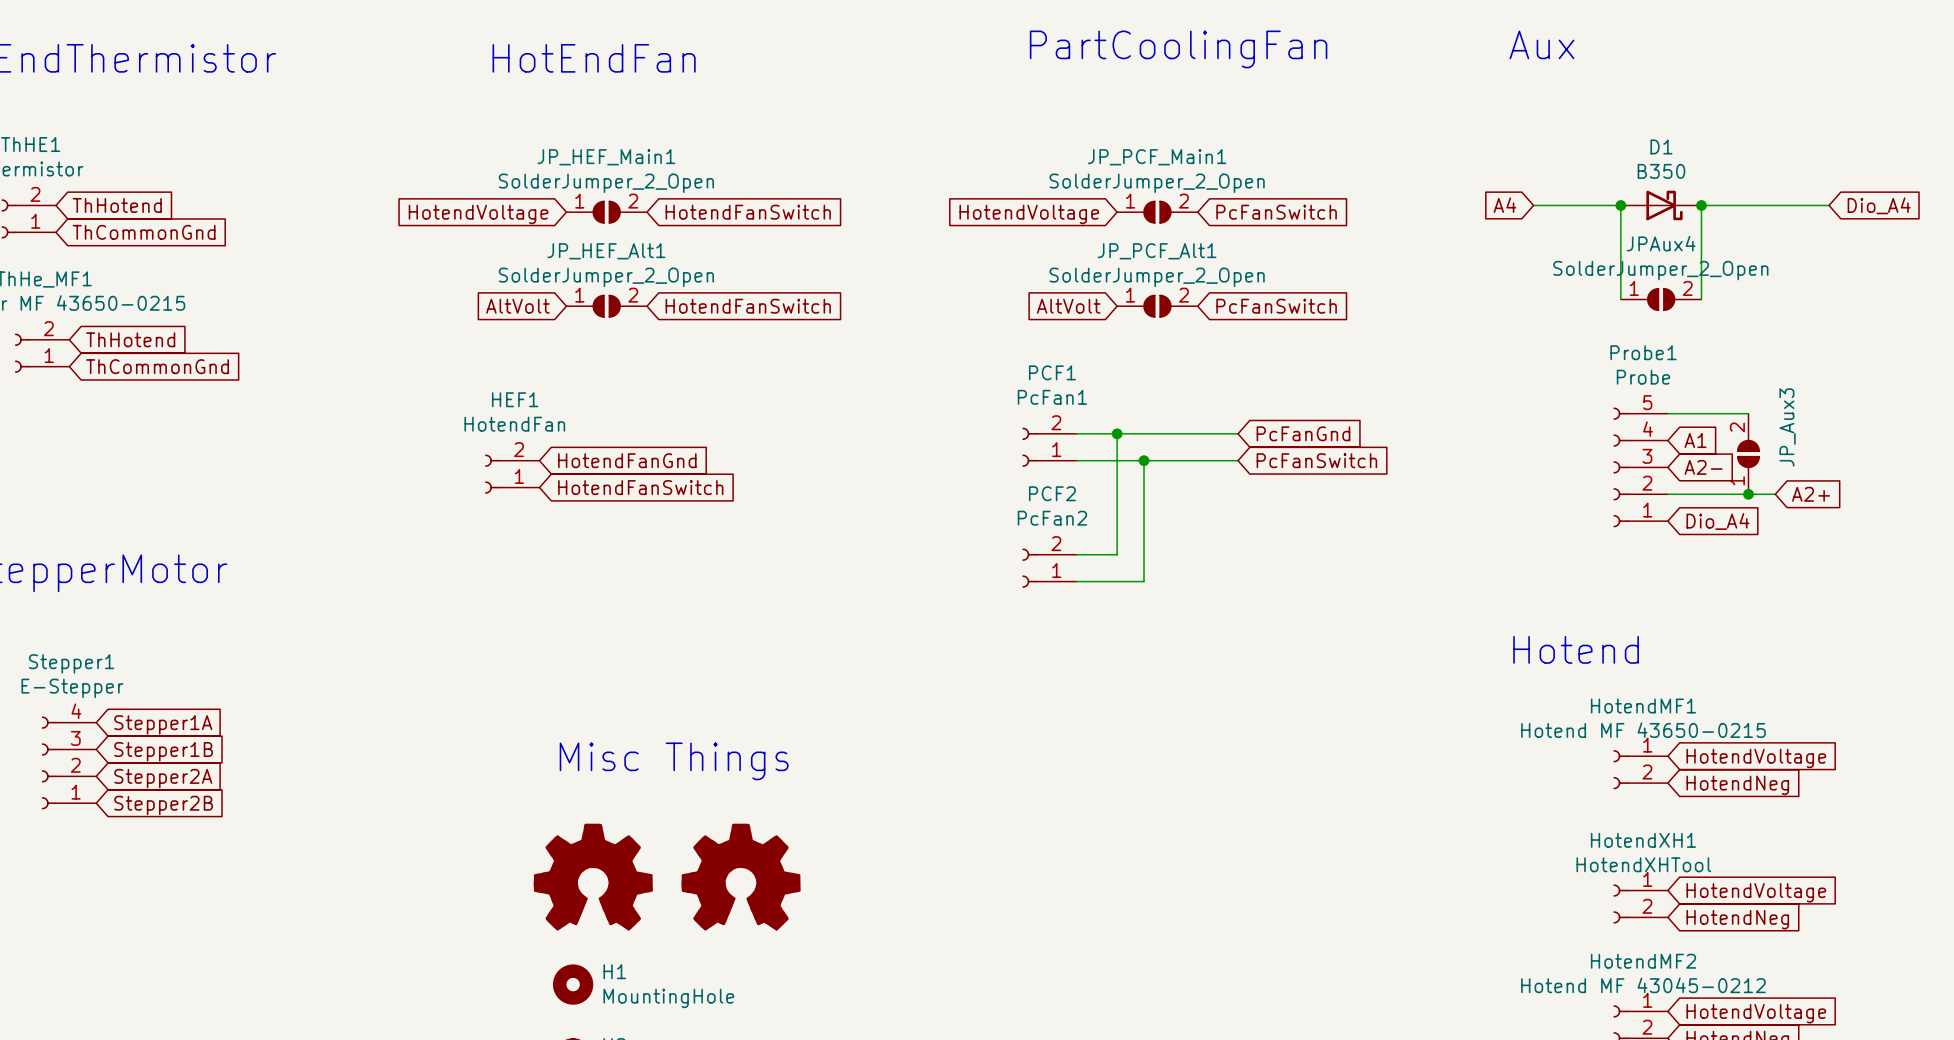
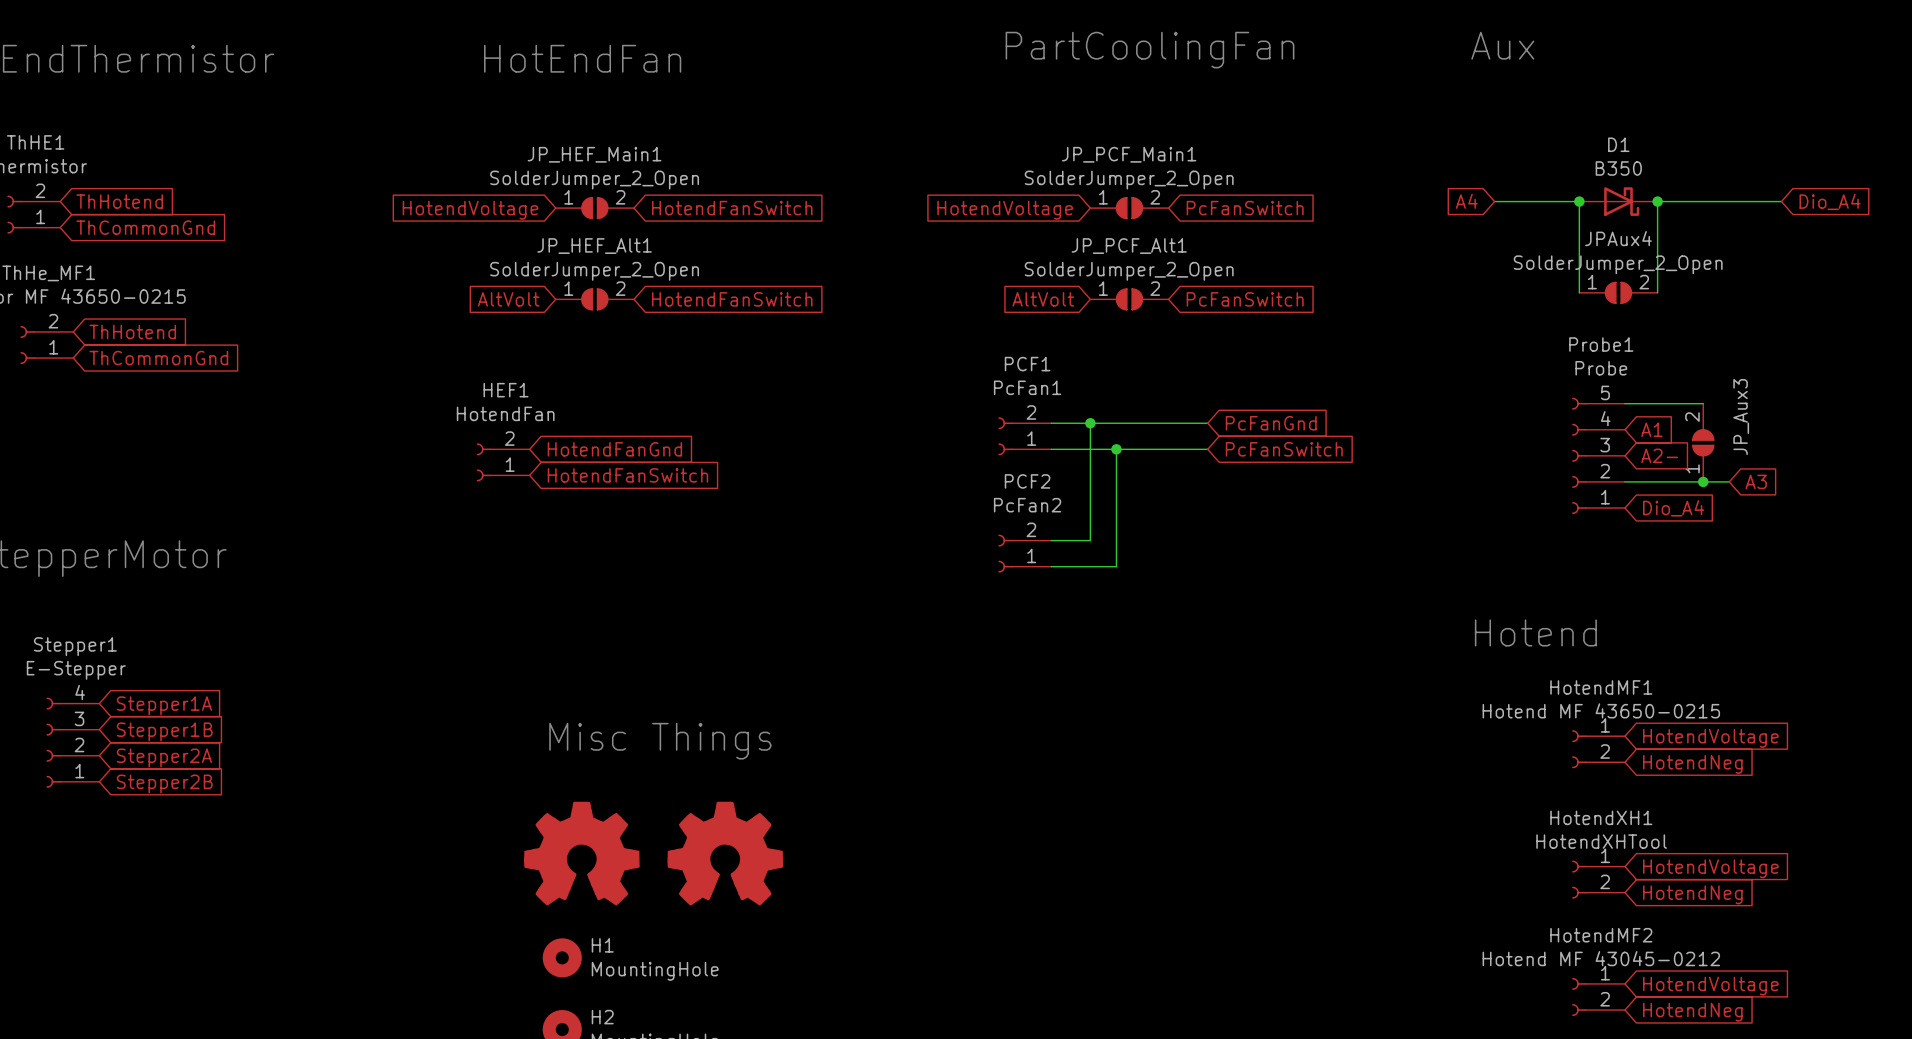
global label: A2+ (1811, 494) -> A3 (1756, 481)

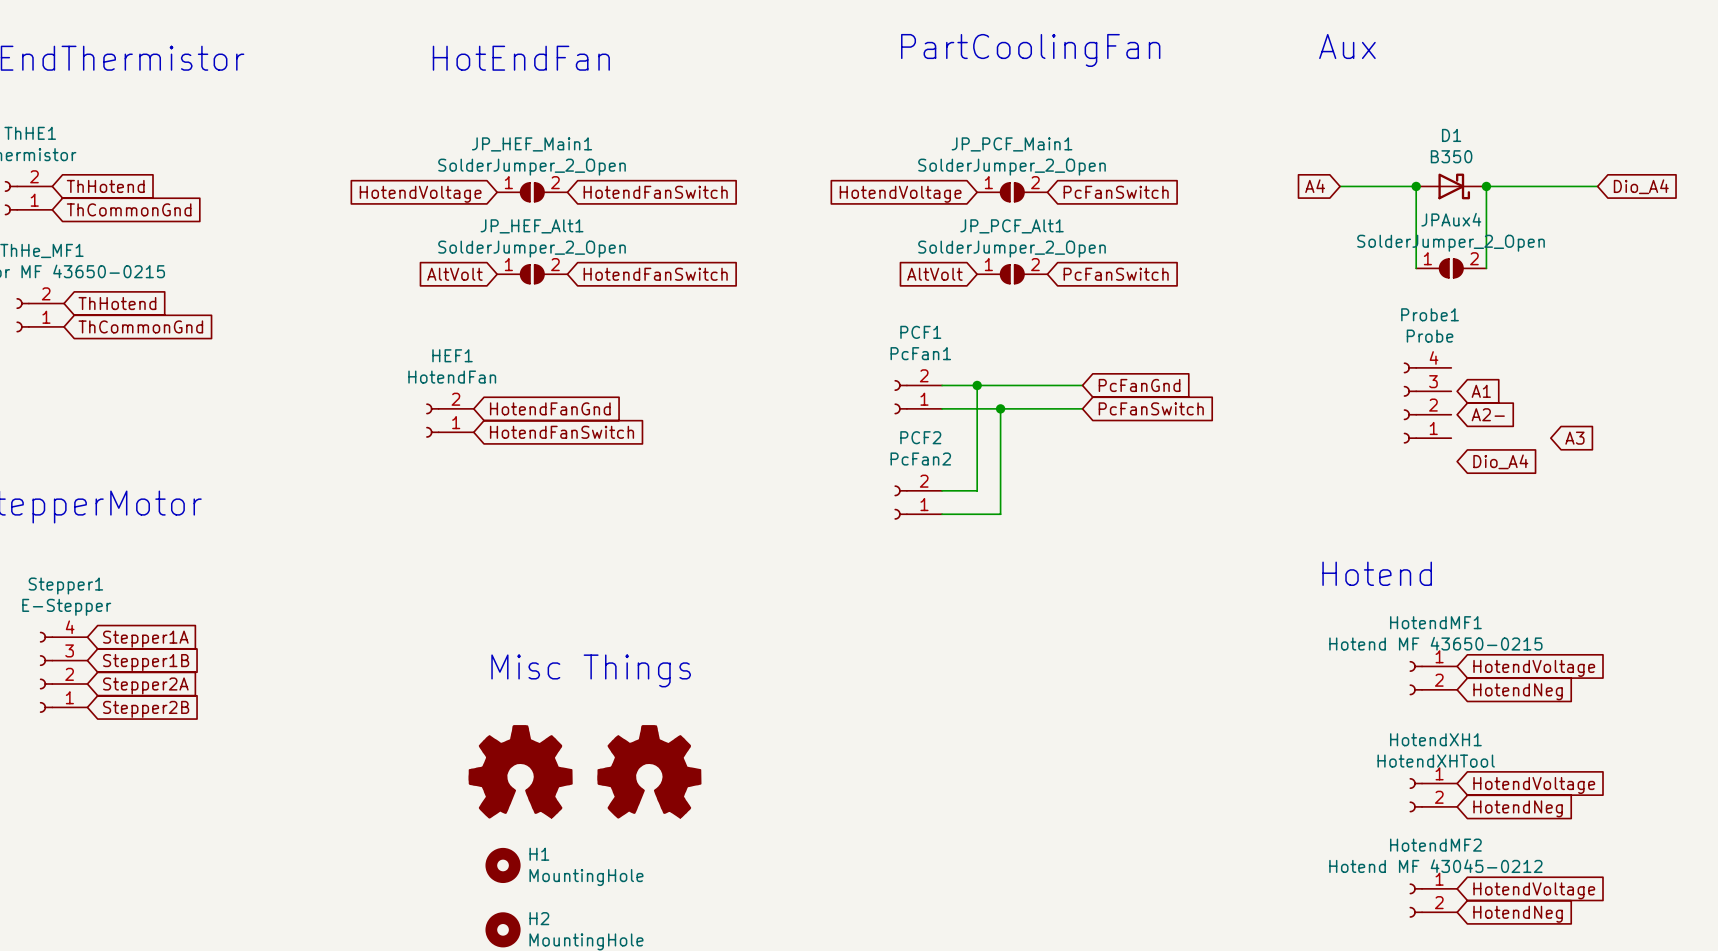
Probe1 symbol: [1572, 397, 1625, 515] -> [1403, 362, 1452, 444]
wire: (1624, 403) (1703, 403) -> none
JP_Aux3: (1703, 442) -> none
wire: (1624, 481) (1729, 481) -> none
junction: (1703, 481) -> none

